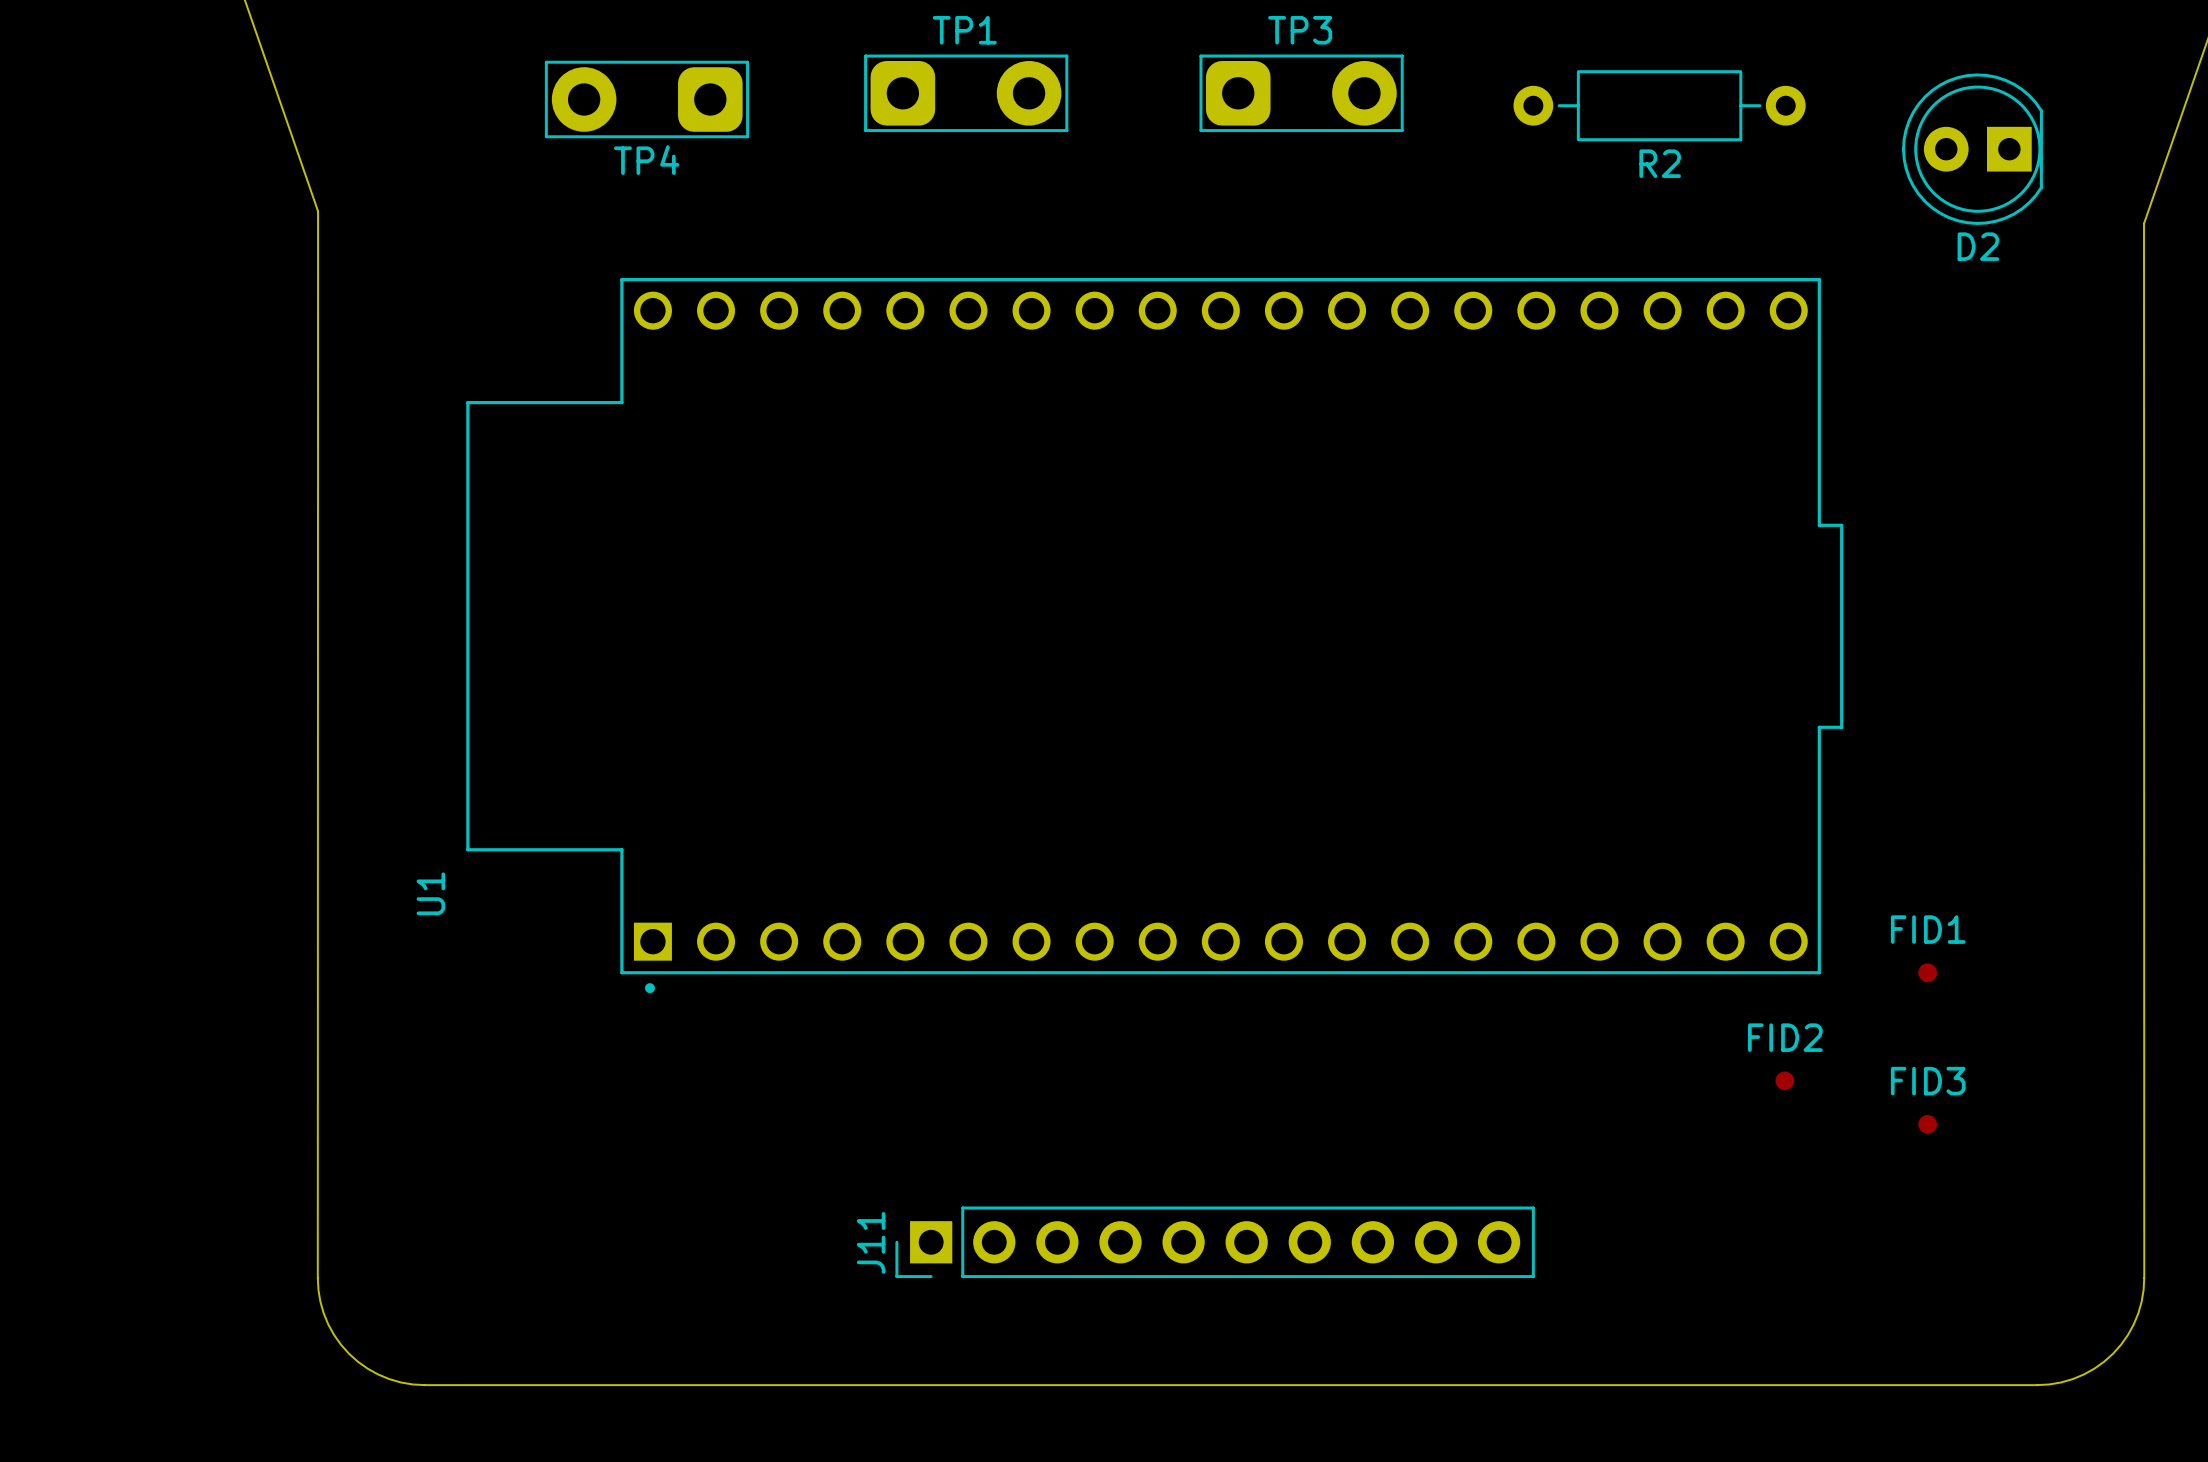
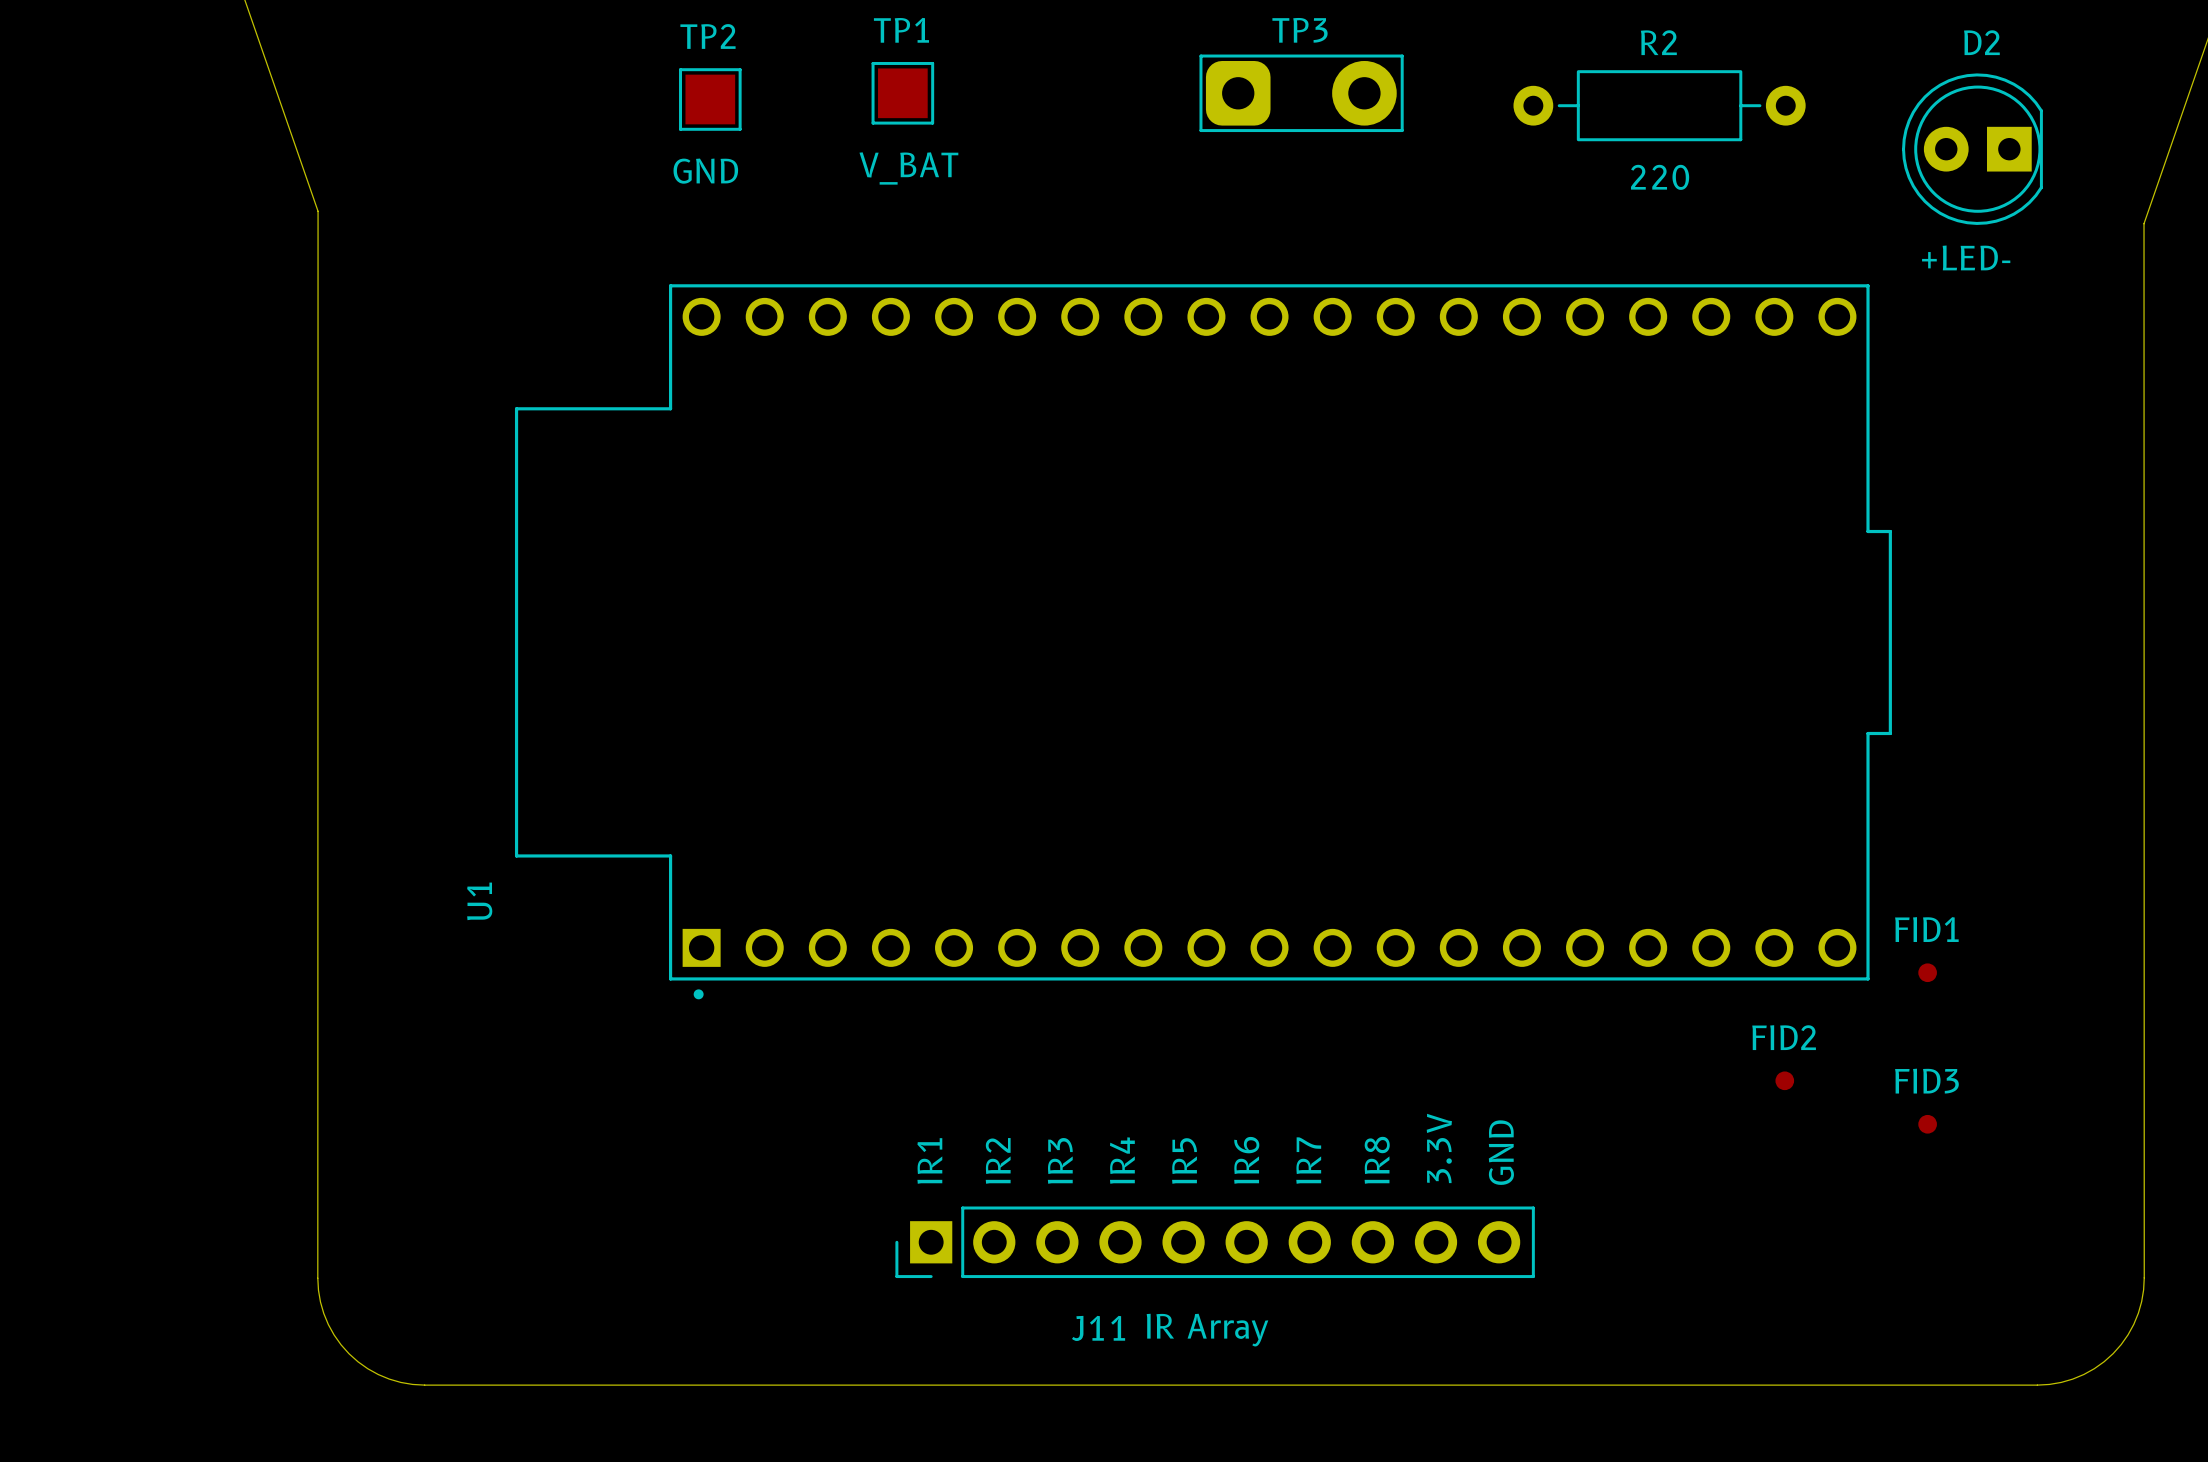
TP1 footprint: [864, 54, 1069, 133] -> [871, 61, 935, 125]
TP4: (646, 99) -> none
TP2: none -> (710, 99)
R2 name position: R2 (1660, 163) -> R2 (1658, 42)
text: none -> V_BAT (908, 168)
text: none -> GND (705, 171)
text: none -> 220 (1660, 177)
D2 name position: D2 (1978, 246) -> D2 (1981, 42)
text: none -> +LED- (1966, 257)
U1 position: (1154, 635) -> (1203, 641)
text: none -> 3.3V (1439, 1148)
text: none -> GND (1501, 1152)
text: none -> IR4 (1122, 1160)
text: none -> IR7 (1308, 1160)
text: none -> IR1 (929, 1160)
text: none -> IR2 (998, 1160)
text: none -> IR3 (1060, 1160)
text: none -> IR5 (1184, 1160)
text: none -> IR6 (1246, 1160)
text: none -> IR8 (1377, 1160)
J11 name rotation: 0° (871, 1242) -> 90° clockwise (1098, 1328)
J11 name position: J11 (871, 1242) -> J11 (1098, 1328)
text: none -> IR Array (1207, 1330)

